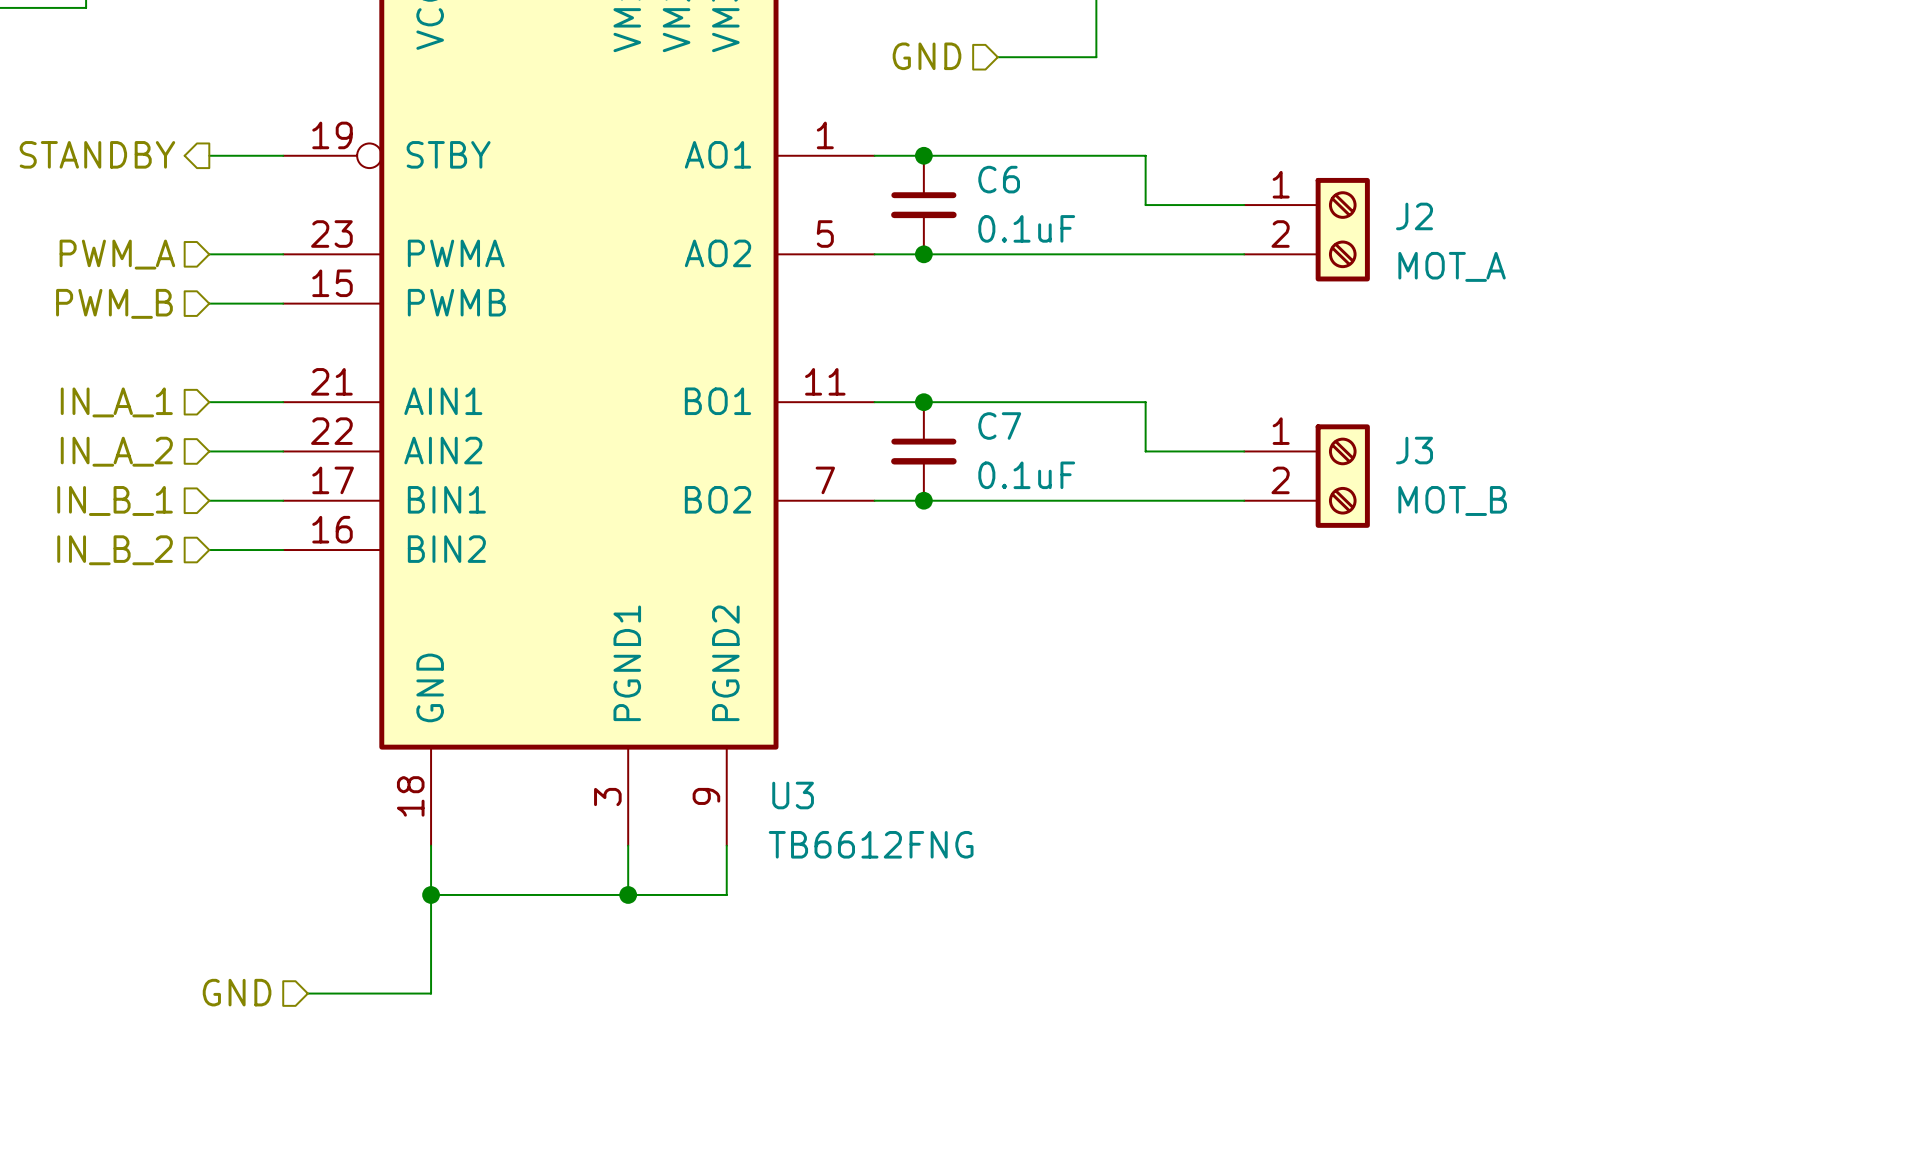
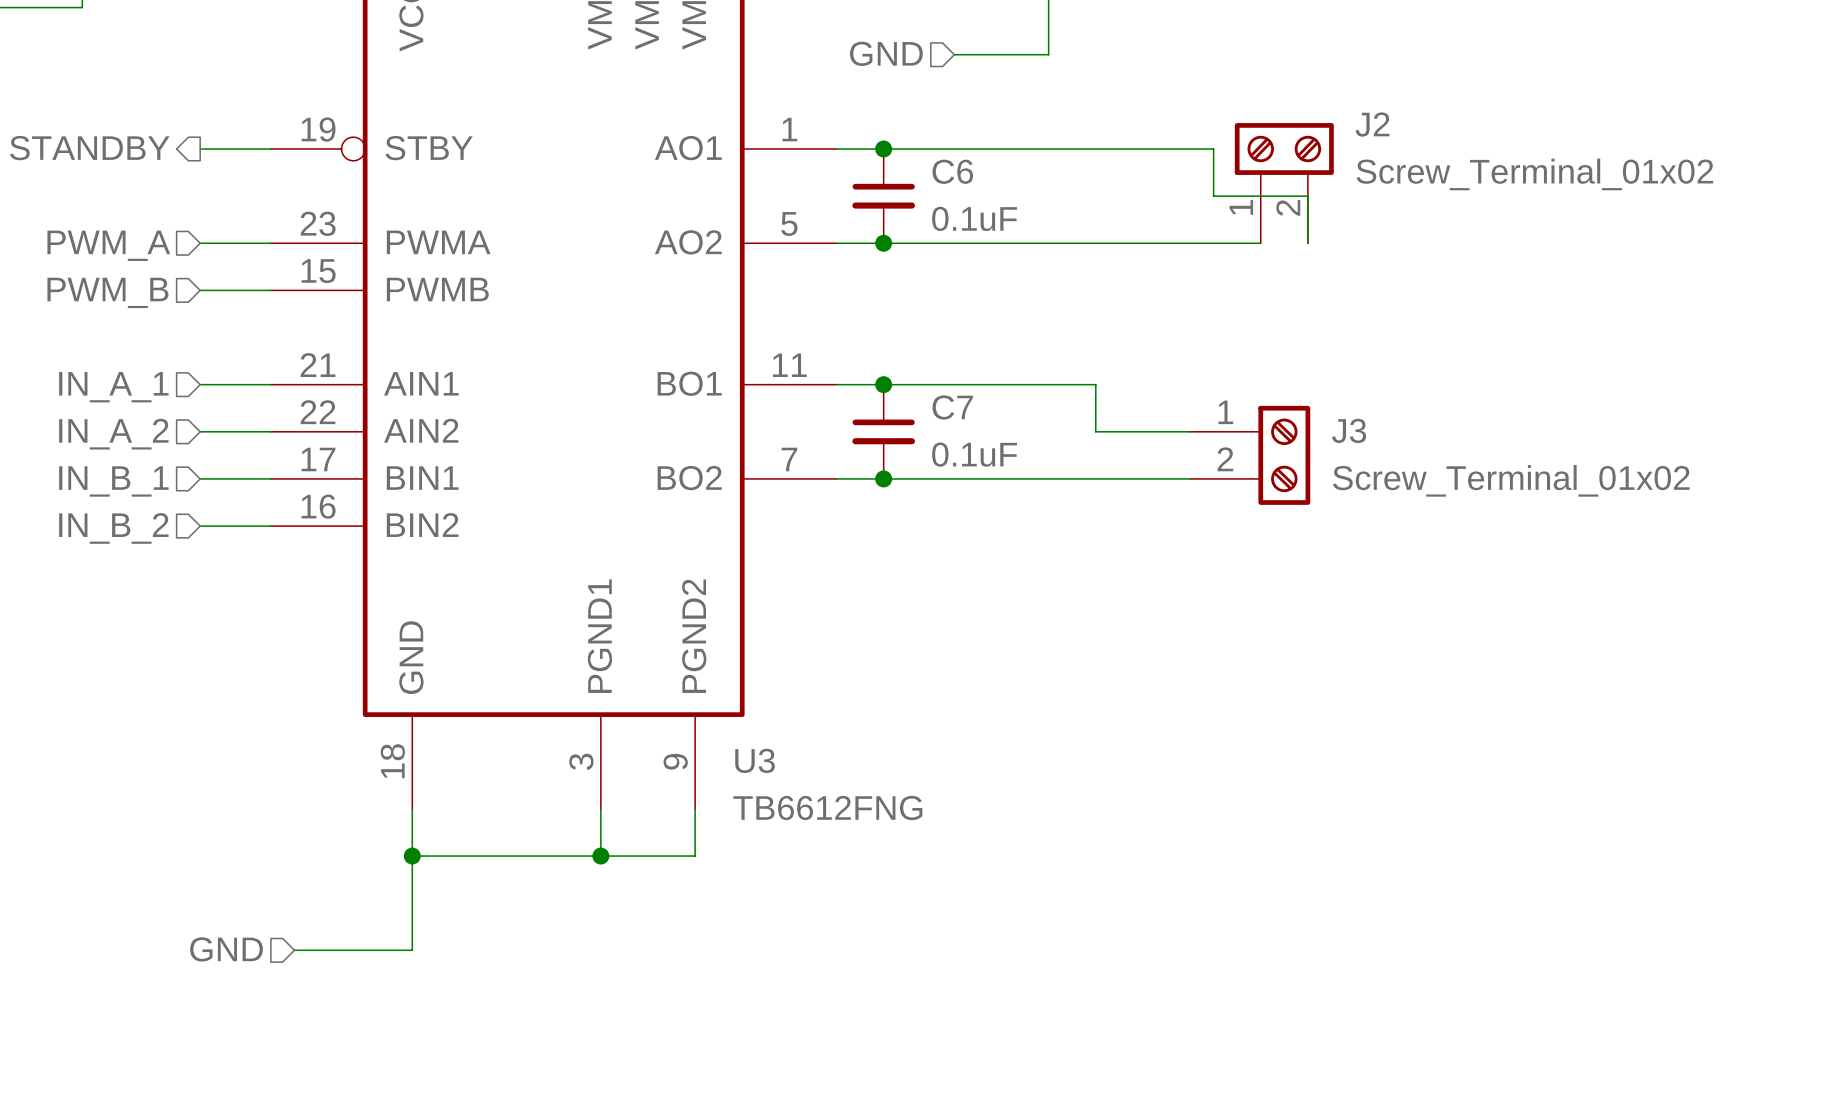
wire: (1145, 155) (1145, 205) (1244, 205) -> (1095, 148) (1213, 148) (1213, 196) (1307, 196) (1307, 243)
J2 name position: J2 (1414, 216) -> J2 (1372, 124)
J2 rotation: 0° (1342, 229) -> 90° counterclockwise (1284, 148)
J2 value: MOT_A (1452, 266) -> Screw_Terminal_01x02 (1534, 174)
J3 value: MOT_B (1452, 500) -> Screw_Terminal_01x02 (1511, 480)

